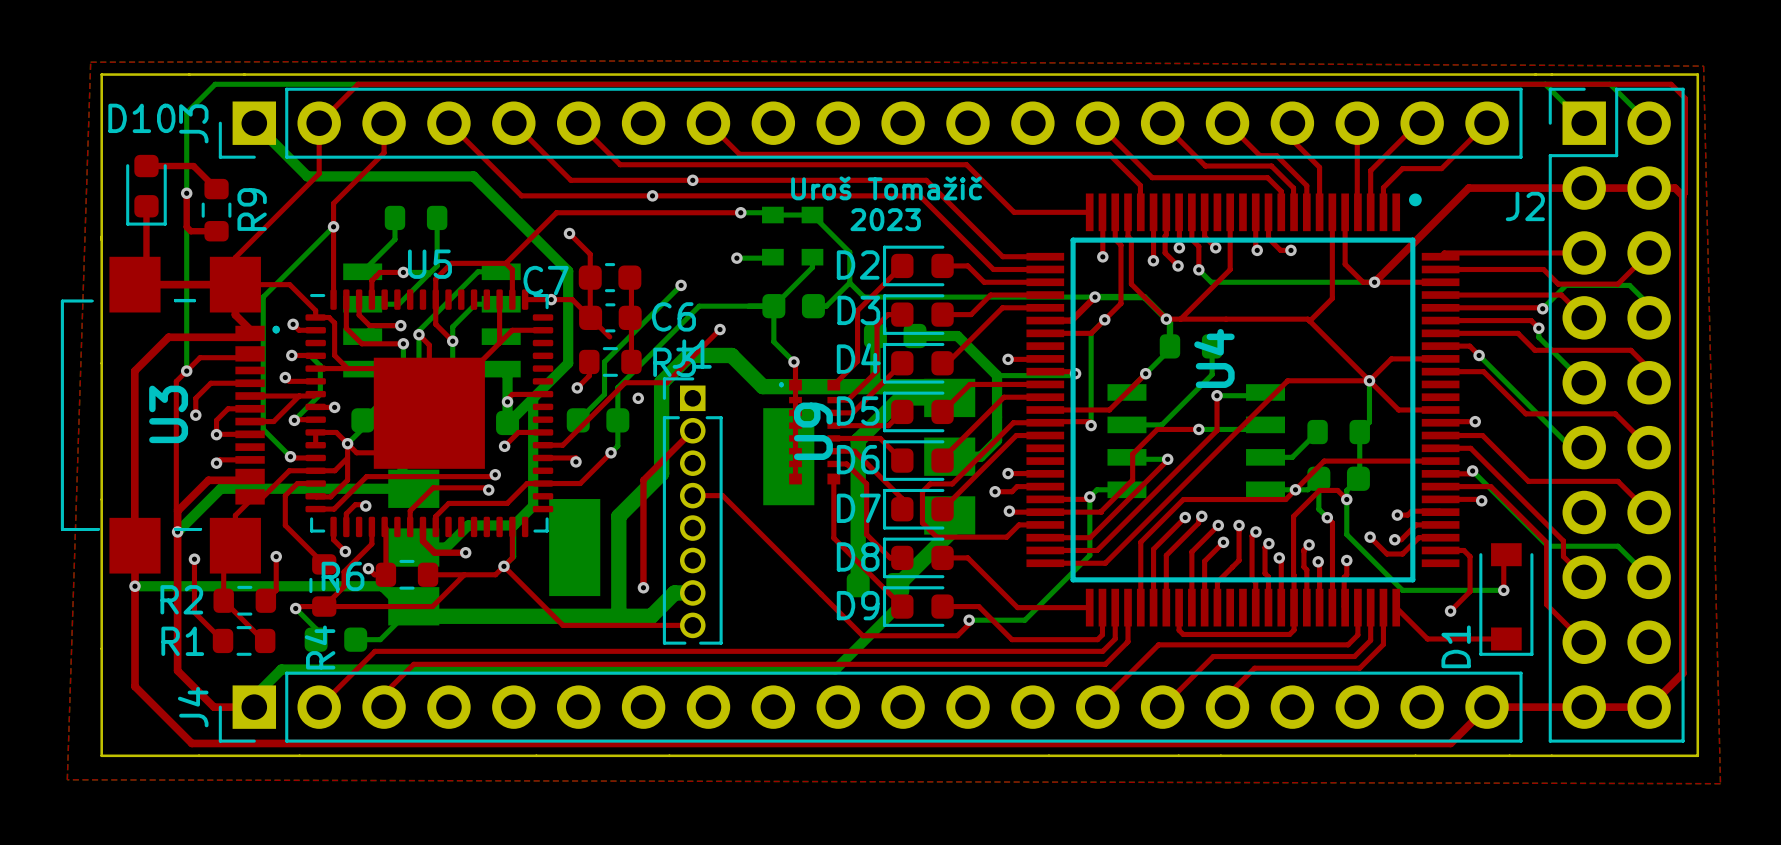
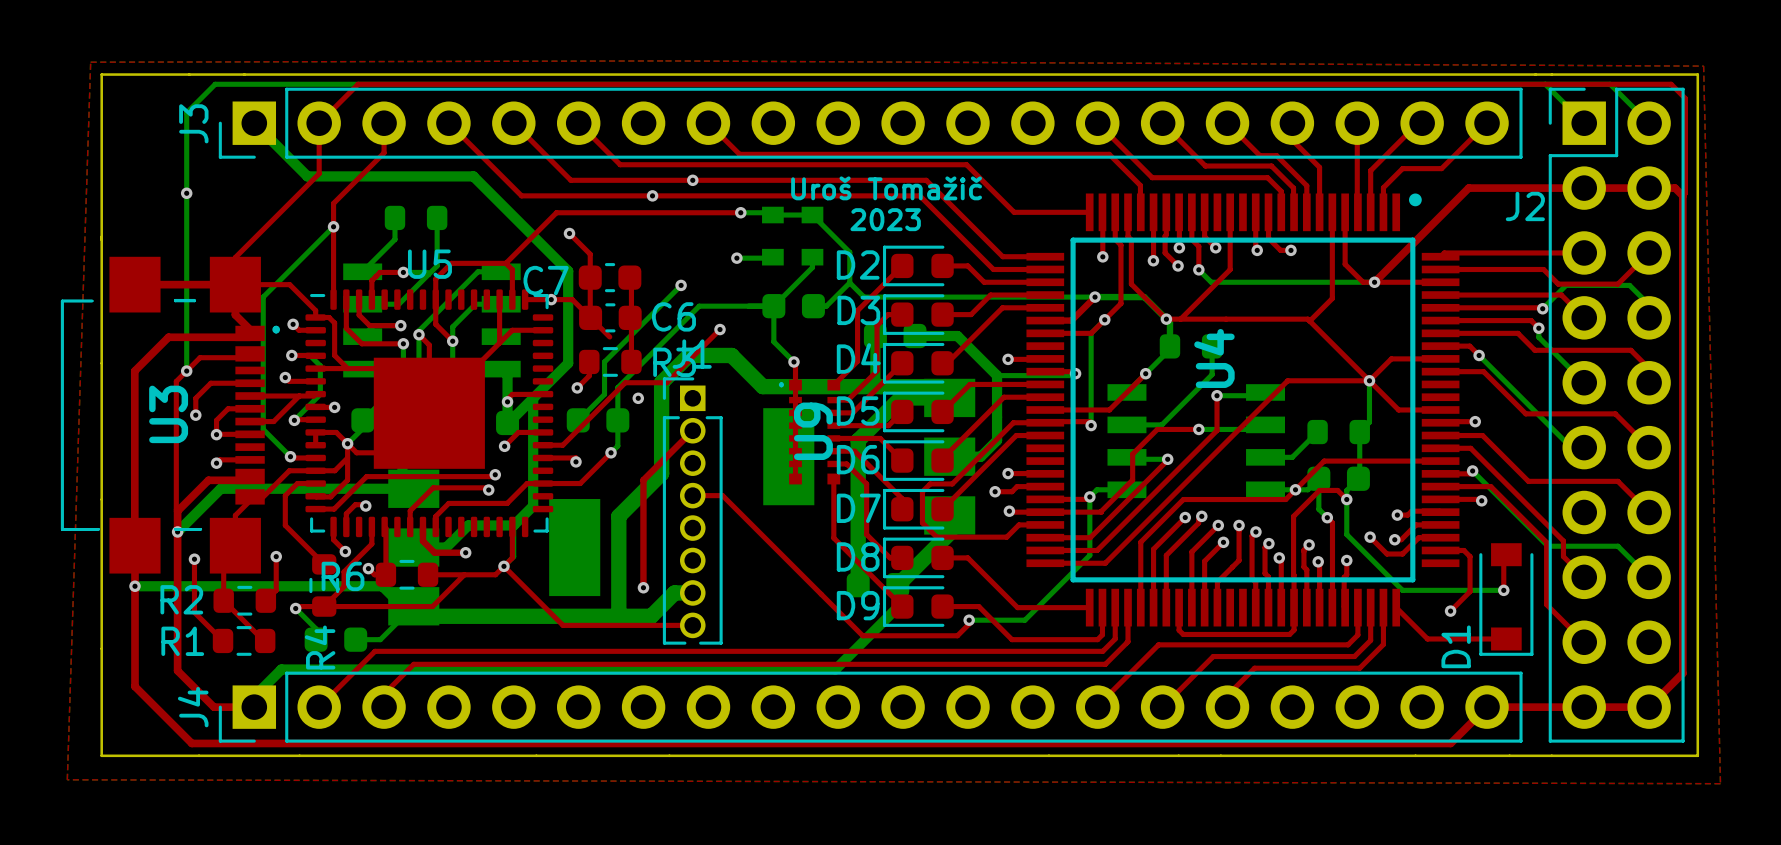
top track: (146, 166) (193, 166) (216, 189) -> none
D10: (146, 190) -> none
top track: (186, 193) (186, 227) (190, 231) (216, 231) -> none
top track: (146, 206) (146, 273) (135, 284) -> none
R9: (216, 210) -> none

